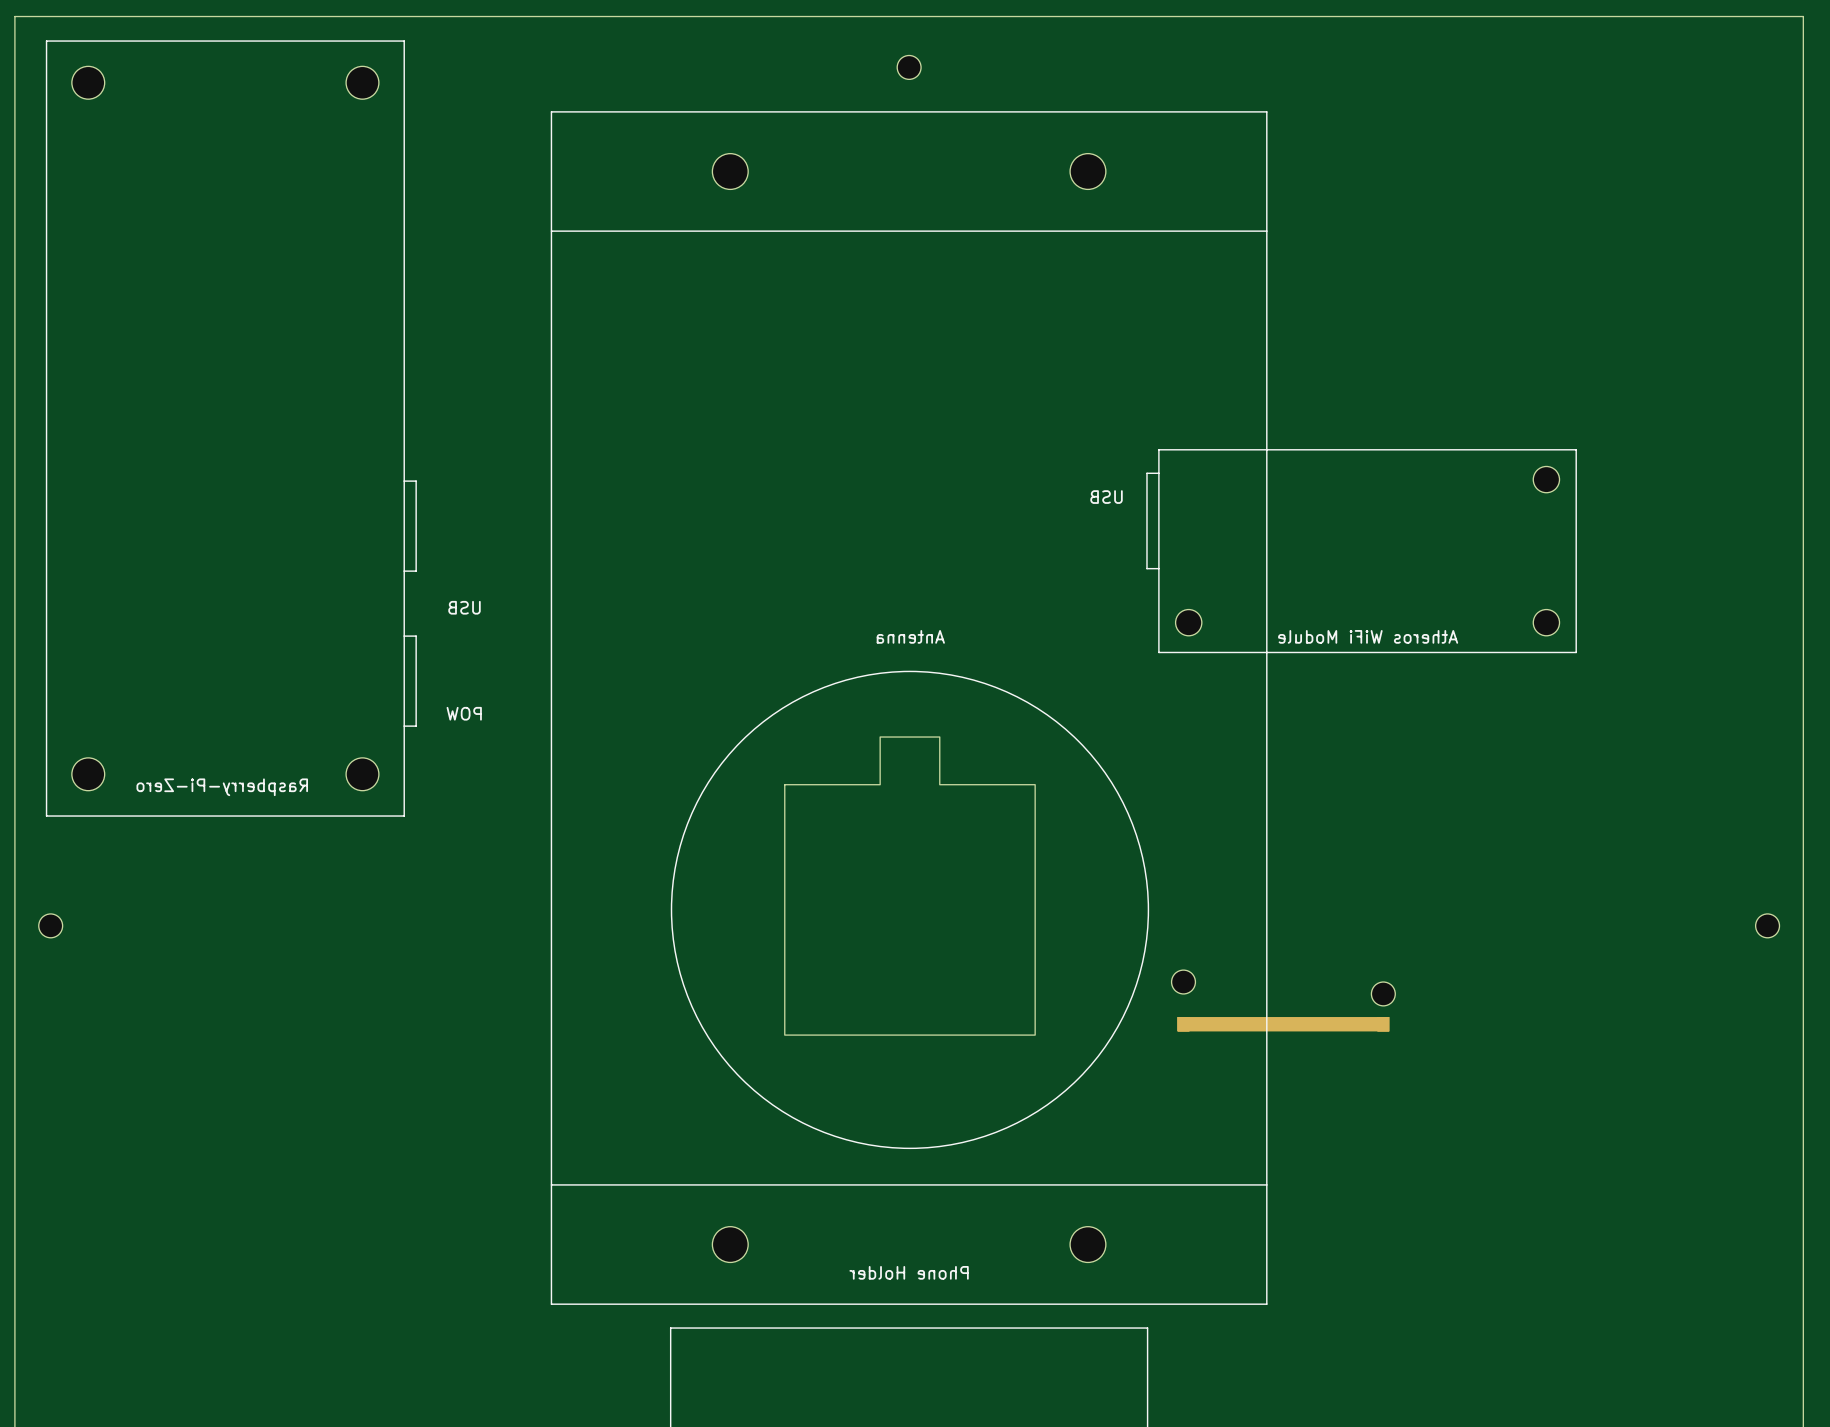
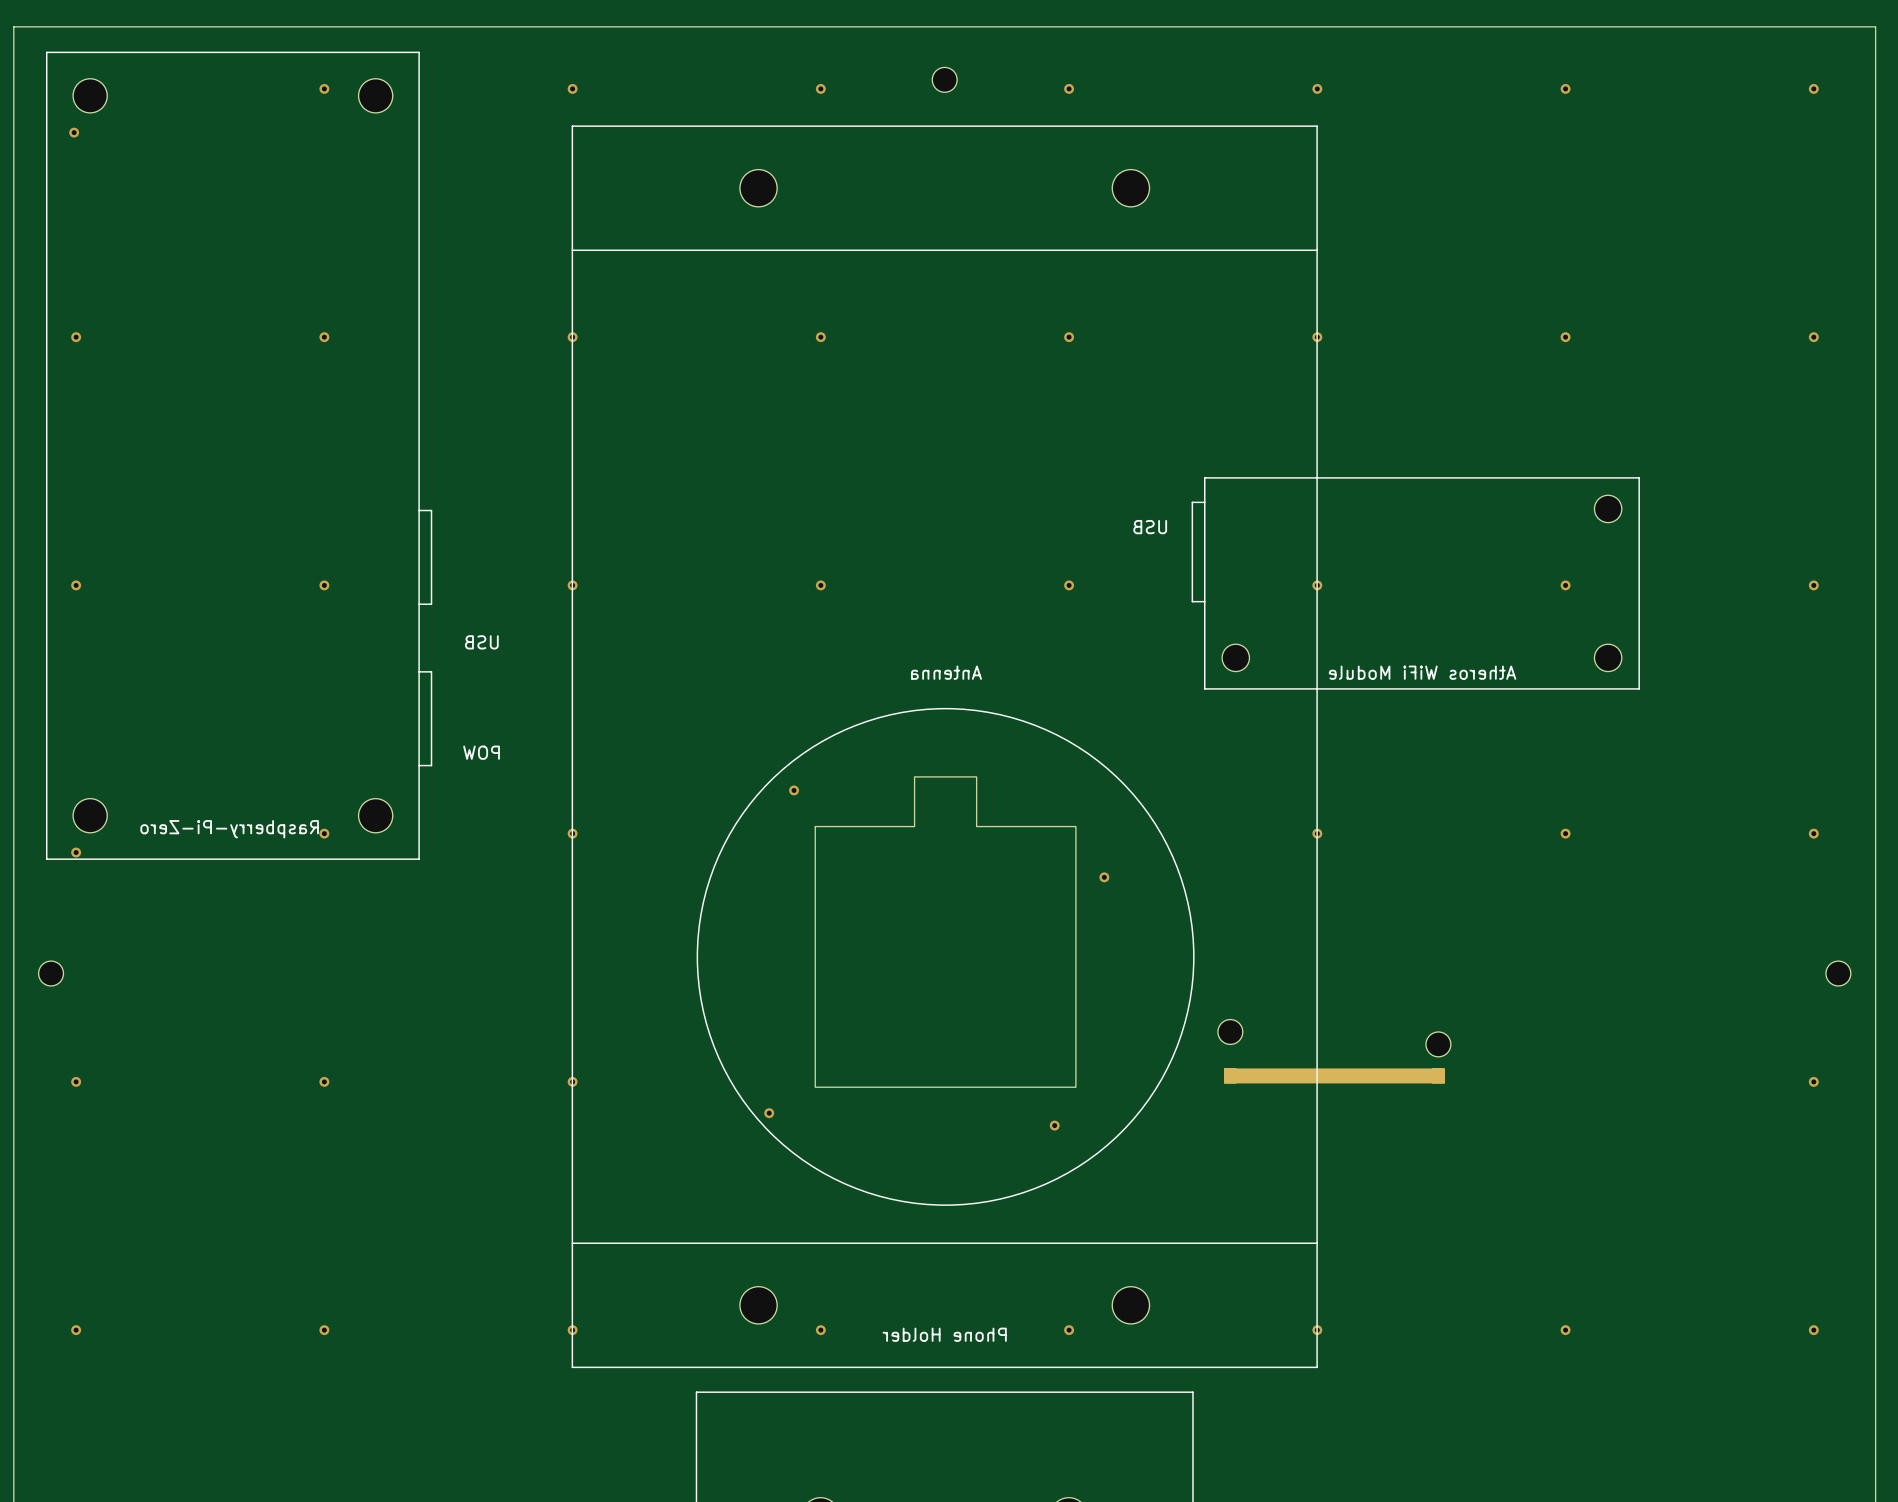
via: none -> (324, 88)
via: none -> (572, 88)
via: none -> (820, 88)
via: none -> (1069, 88)
via: none -> (1317, 88)
via: none -> (1565, 88)
via: none -> (1813, 88)
via: none -> (74, 132)
via: none -> (76, 337)
via: none -> (324, 337)
via: none -> (572, 337)
via: none -> (820, 337)
via: none -> (1069, 337)
via: none -> (1317, 337)
via: none -> (1565, 337)
via: none -> (1813, 337)
via: none -> (76, 585)
via: none -> (324, 585)
via: none -> (572, 585)
via: none -> (820, 585)
via: none -> (1069, 585)
via: none -> (1317, 585)
via: none -> (1565, 585)
via: none -> (1813, 585)
via: none -> (794, 790)
via: none -> (324, 833)
via: none -> (572, 833)
via: none -> (1317, 833)
via: none -> (1565, 833)
via: none -> (1813, 833)
via: none -> (76, 852)
via: none -> (1104, 877)
via: none -> (76, 1081)
via: none -> (324, 1081)
via: none -> (572, 1081)
via: none -> (1813, 1081)
via: none -> (769, 1113)
via: none -> (1054, 1125)
via: none -> (76, 1330)
via: none -> (324, 1330)
via: none -> (572, 1330)
via: none -> (820, 1330)
via: none -> (1069, 1330)
via: none -> (1317, 1330)
via: none -> (1565, 1330)
via: none -> (1813, 1330)

